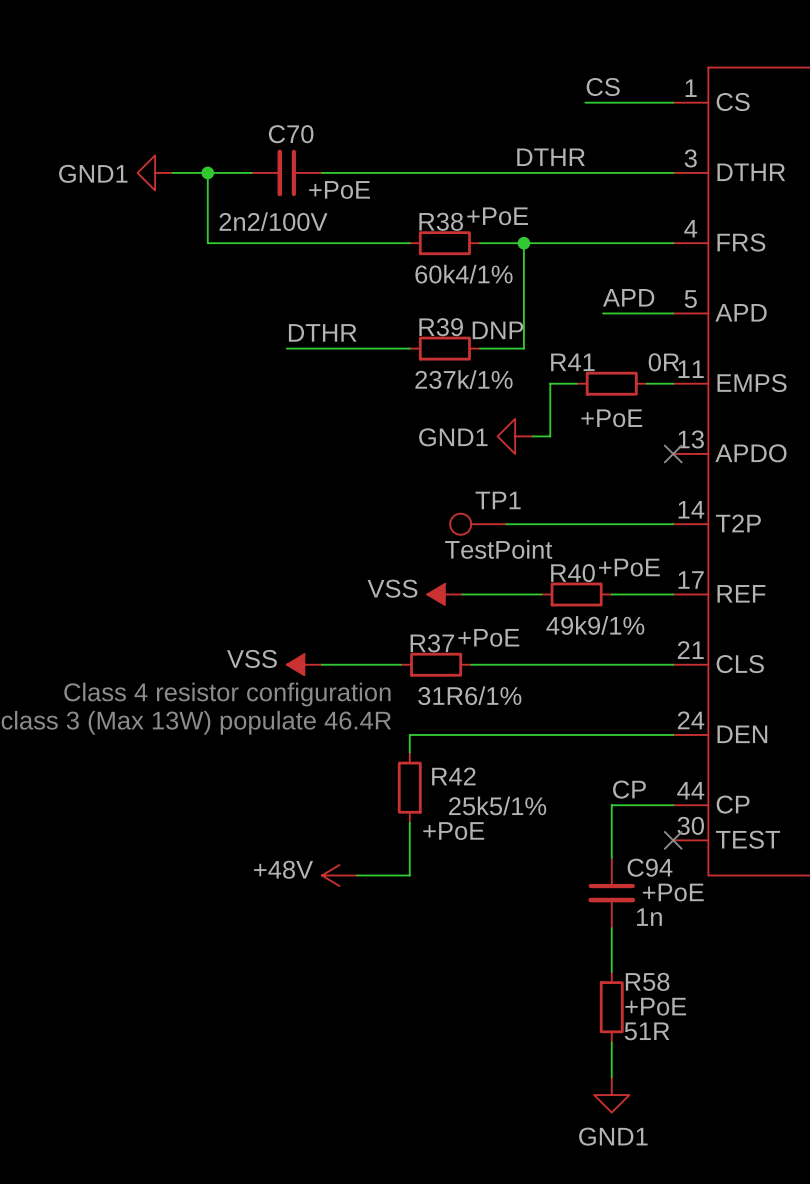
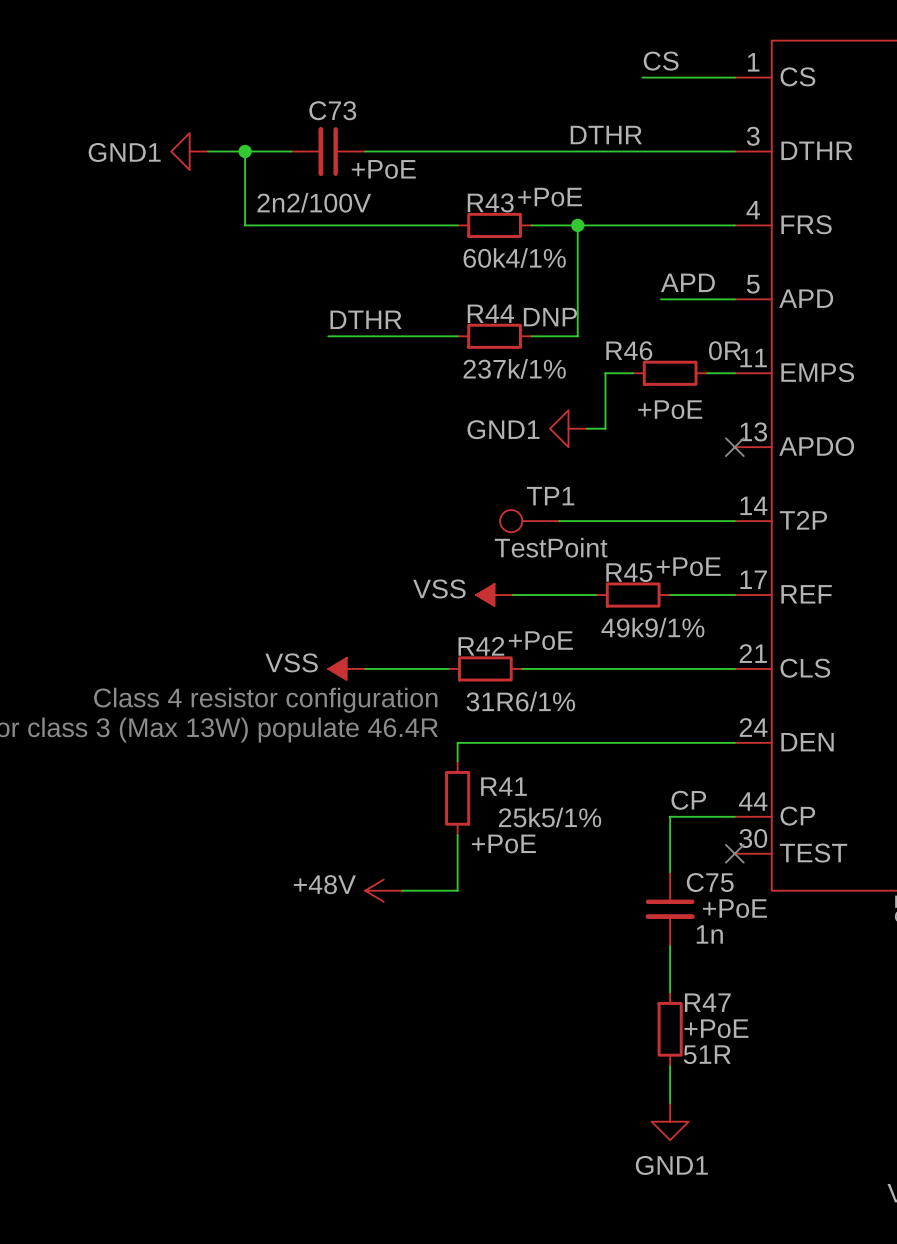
C70 name: C70 (291, 134) -> C73 (332, 110)
R38 name: R38 (441, 221) -> R43 (490, 202)
R39 name: R39 (441, 327) -> R44 (490, 313)
R41 name: R41 (572, 362) -> R46 (629, 350)
R40 name: R40 (572, 573) -> R45 (629, 572)
R37 name: R37 (432, 643) -> R42 (481, 646)
R42 name: R42 (453, 776) -> R41 (504, 786)
C94 name: C94 (650, 867) -> C75 (710, 882)
R58 name: R58 (647, 981) -> R47 (707, 1002)

